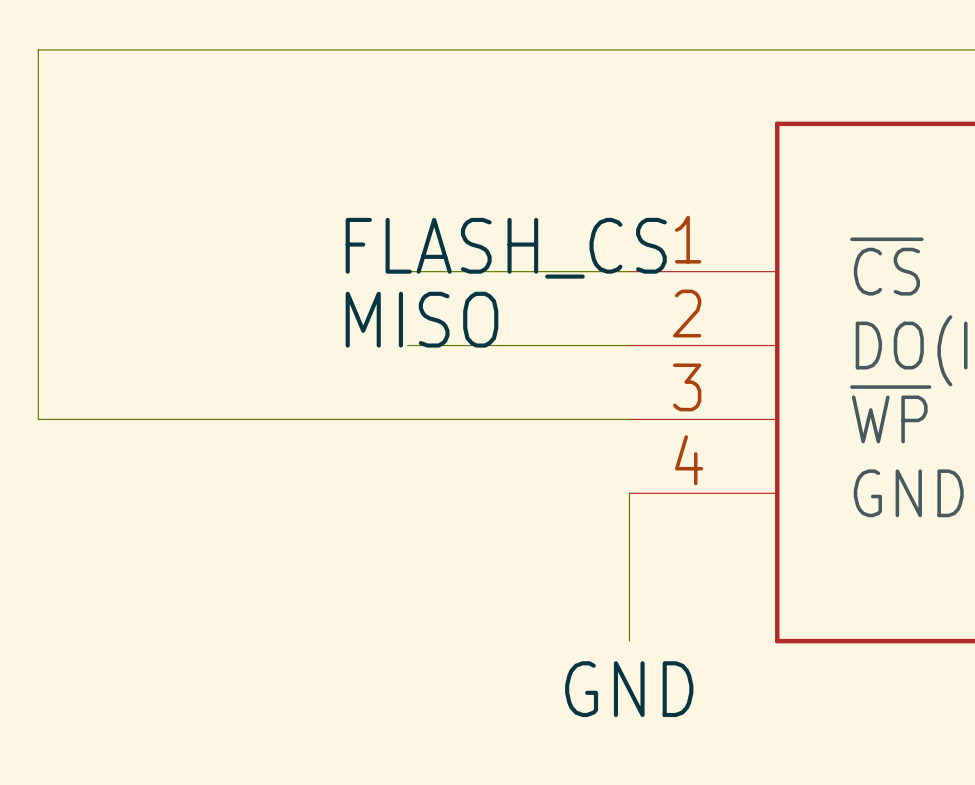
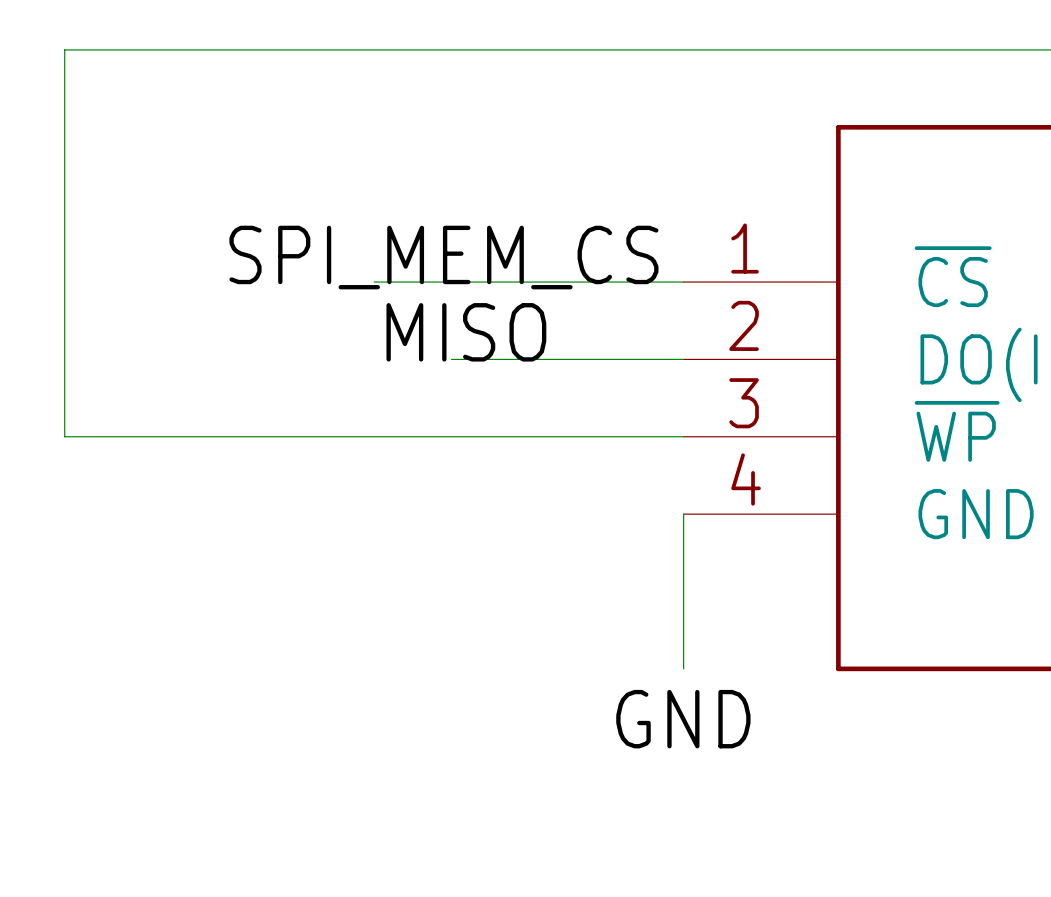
label: none -> SPI_MEM_CS (443, 257)
label: FLASH_CS (506, 248) -> none
wire: none -> (374, 282) (451, 282)

